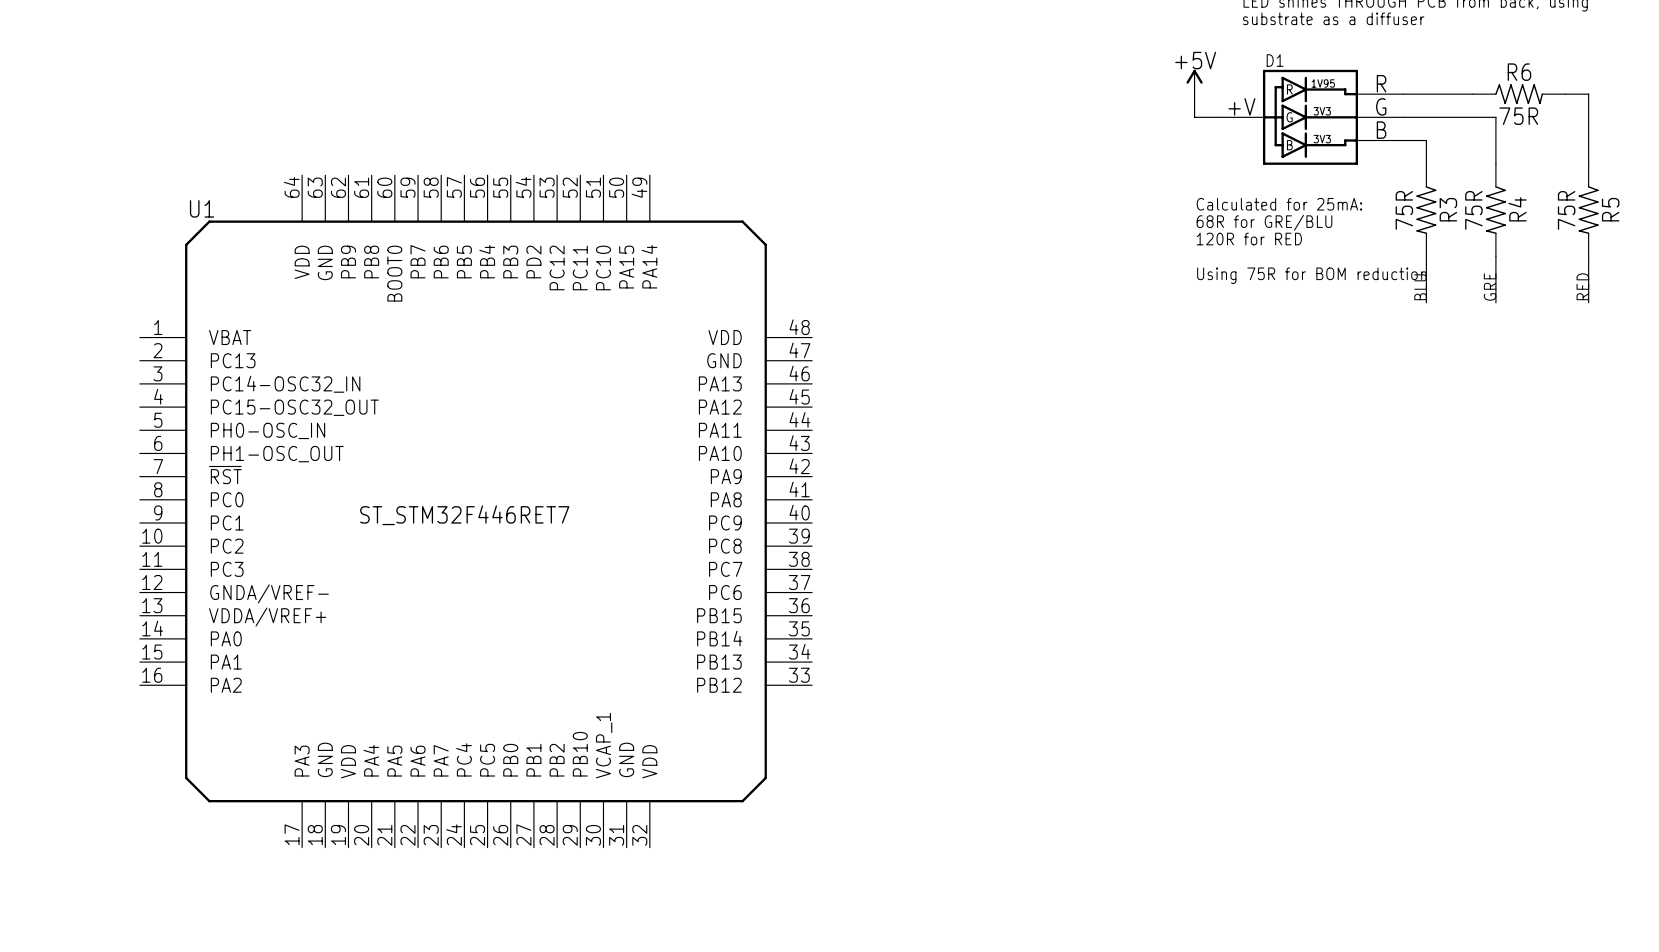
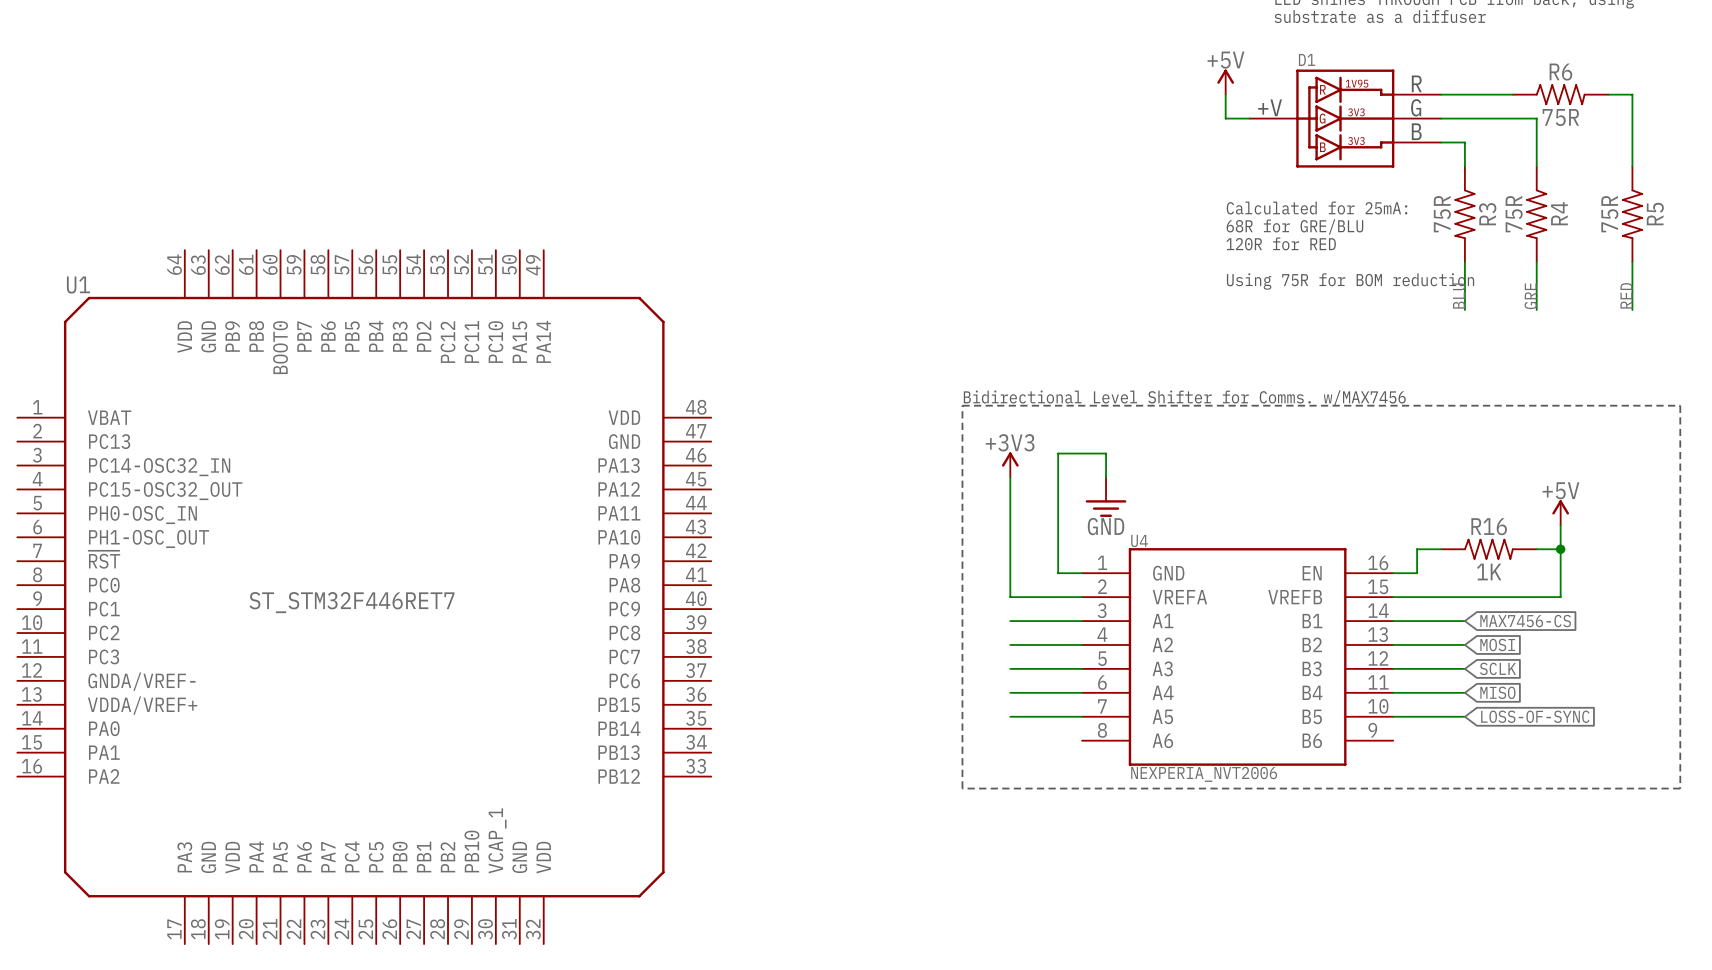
text: none -> Bidirectional Level Shifter for Comms. w/MAX7456 (1184, 397)
line: none -> (962, 405) (1680, 405) (1680, 788) (962, 788) (962, 405)
power symbol: none -> +3V3 (1010, 464)
wire: none -> (1010, 477) (1010, 597) (1082, 597)
wire: none -> (1106, 477) (1106, 453) (1058, 453) (1058, 573) (1082, 573)
power symbol: none -> GND (1106, 497)
power symbol: none -> +5V (1560, 512)
U1 position: (475, 511) -> (364, 597)
wire: none -> (1560, 525) (1560, 597) (1393, 597)
wire: none -> (1441, 549) (1417, 549) (1417, 573) (1393, 573)
R16: none -> (1488, 549)
wire: none -> (1536, 549) (1560, 549)
junction: none -> (1560, 549)
global label: none -> MAX7456-CS (1525, 621)
wire: none -> (1010, 621) (1082, 621)
wire: none -> (1393, 621) (1464, 621)
wire: none -> (1010, 644) (1082, 644)
wire: none -> (1393, 644) (1464, 644)
global label: none -> MOSI (1497, 644)
U4: none -> NEXPERIA_NVT2006 (1237, 656)
wire: none -> (1010, 668) (1082, 668)
wire: none -> (1393, 668) (1464, 668)
global label: none -> SCLK (1497, 668)
wire: none -> (1010, 692) (1082, 692)
wire: none -> (1393, 692) (1464, 692)
global label: none -> MISO (1497, 692)
wire: none -> (1010, 716) (1082, 716)
wire: none -> (1393, 716) (1464, 716)
global label: none -> LOSS-OF-SYNC (1535, 716)

